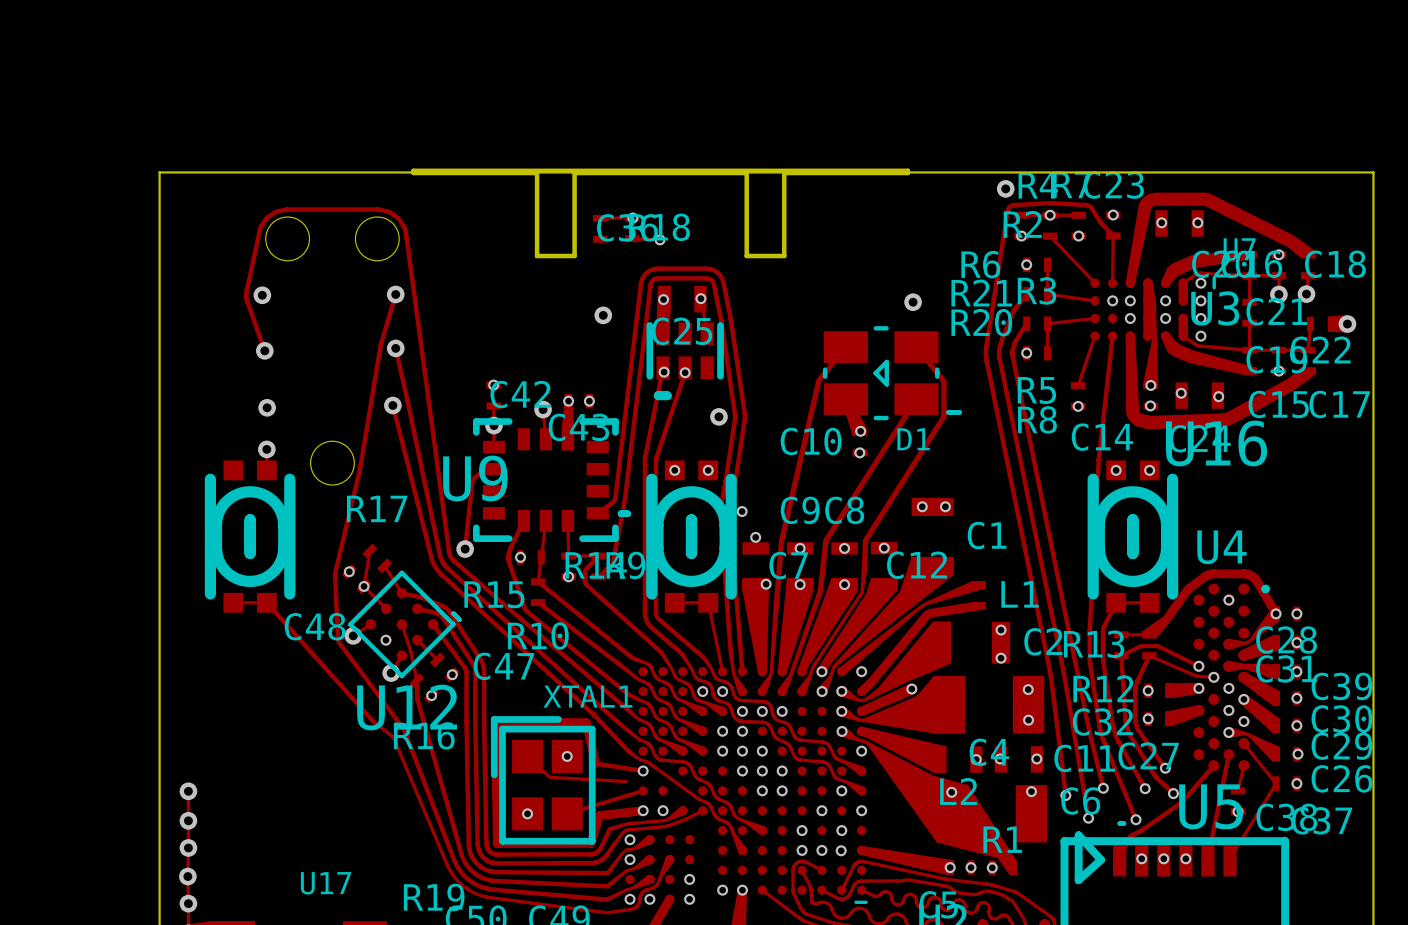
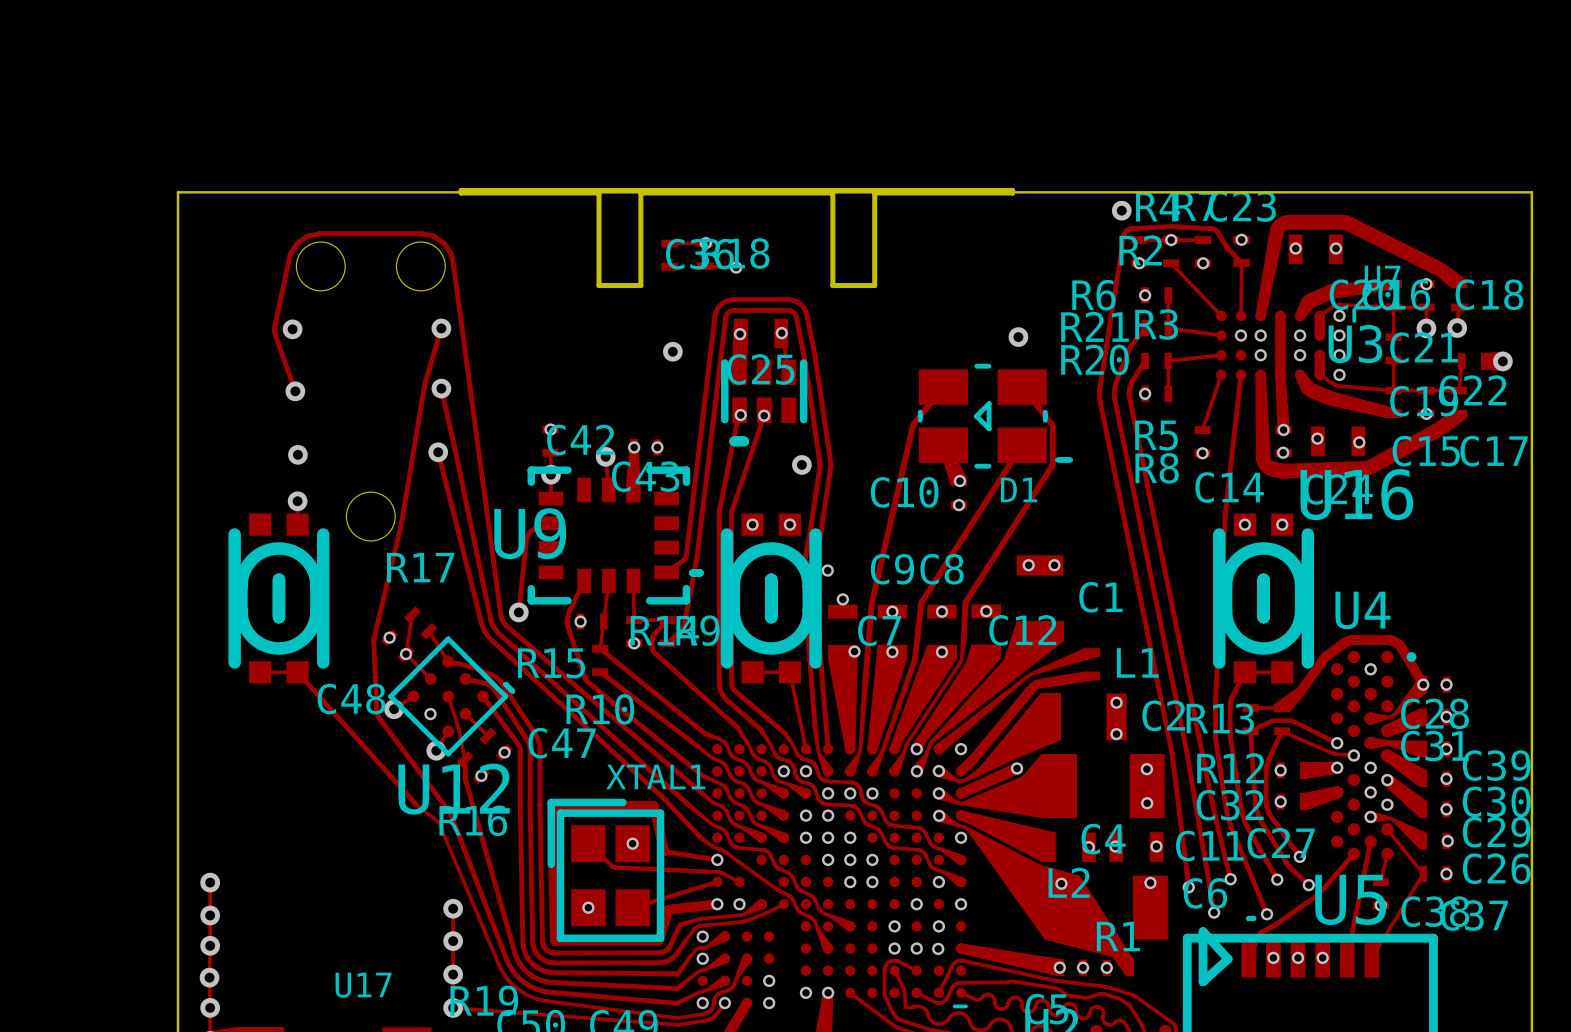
part footprint: [1143, 278, 1159, 389] -> [1275, 369, 1290, 437]
track: (527, 756) (550, 777) (626, 781) -> (588, 843) (613, 867) (717, 872) (739, 882)
track: none -> (453, 908) (453, 1007) (678, 1024) (709, 1019) (715, 1015) (724, 1003)
via: none -> (453, 908)
via: none -> (453, 941)
via: none -> (453, 974)
via: none -> (453, 1007)

